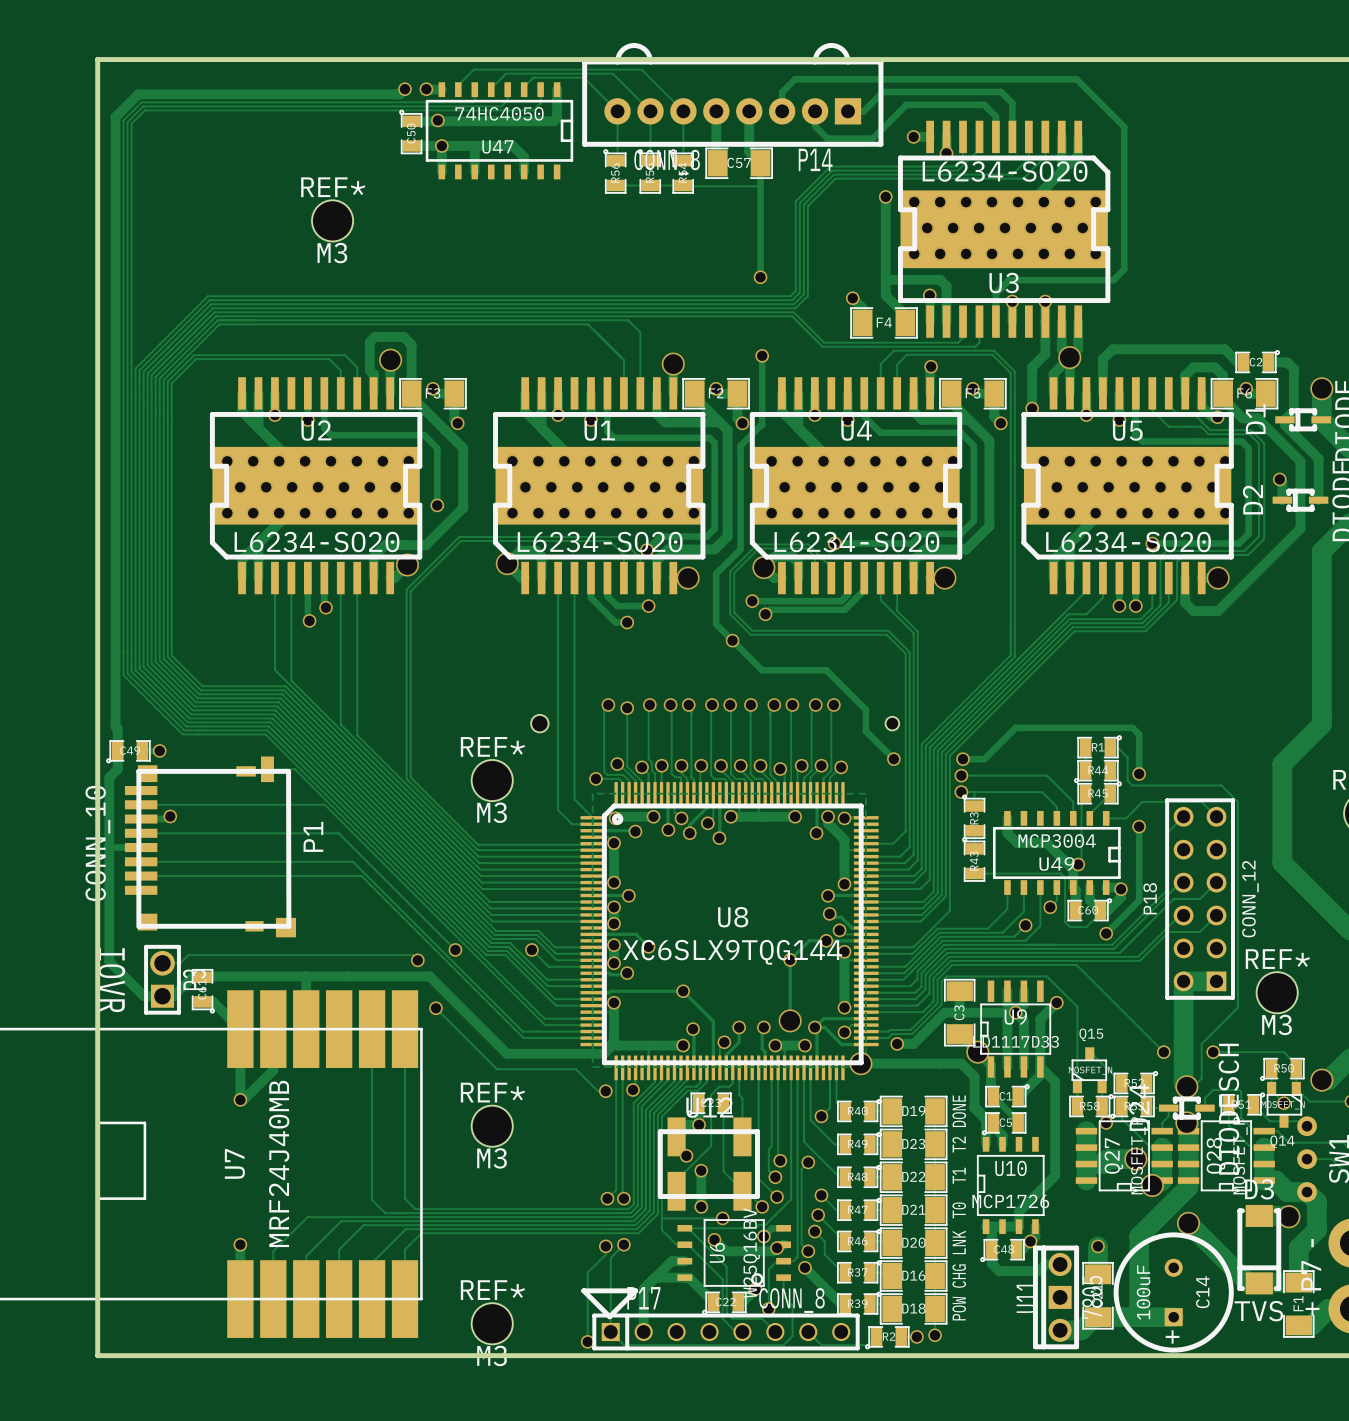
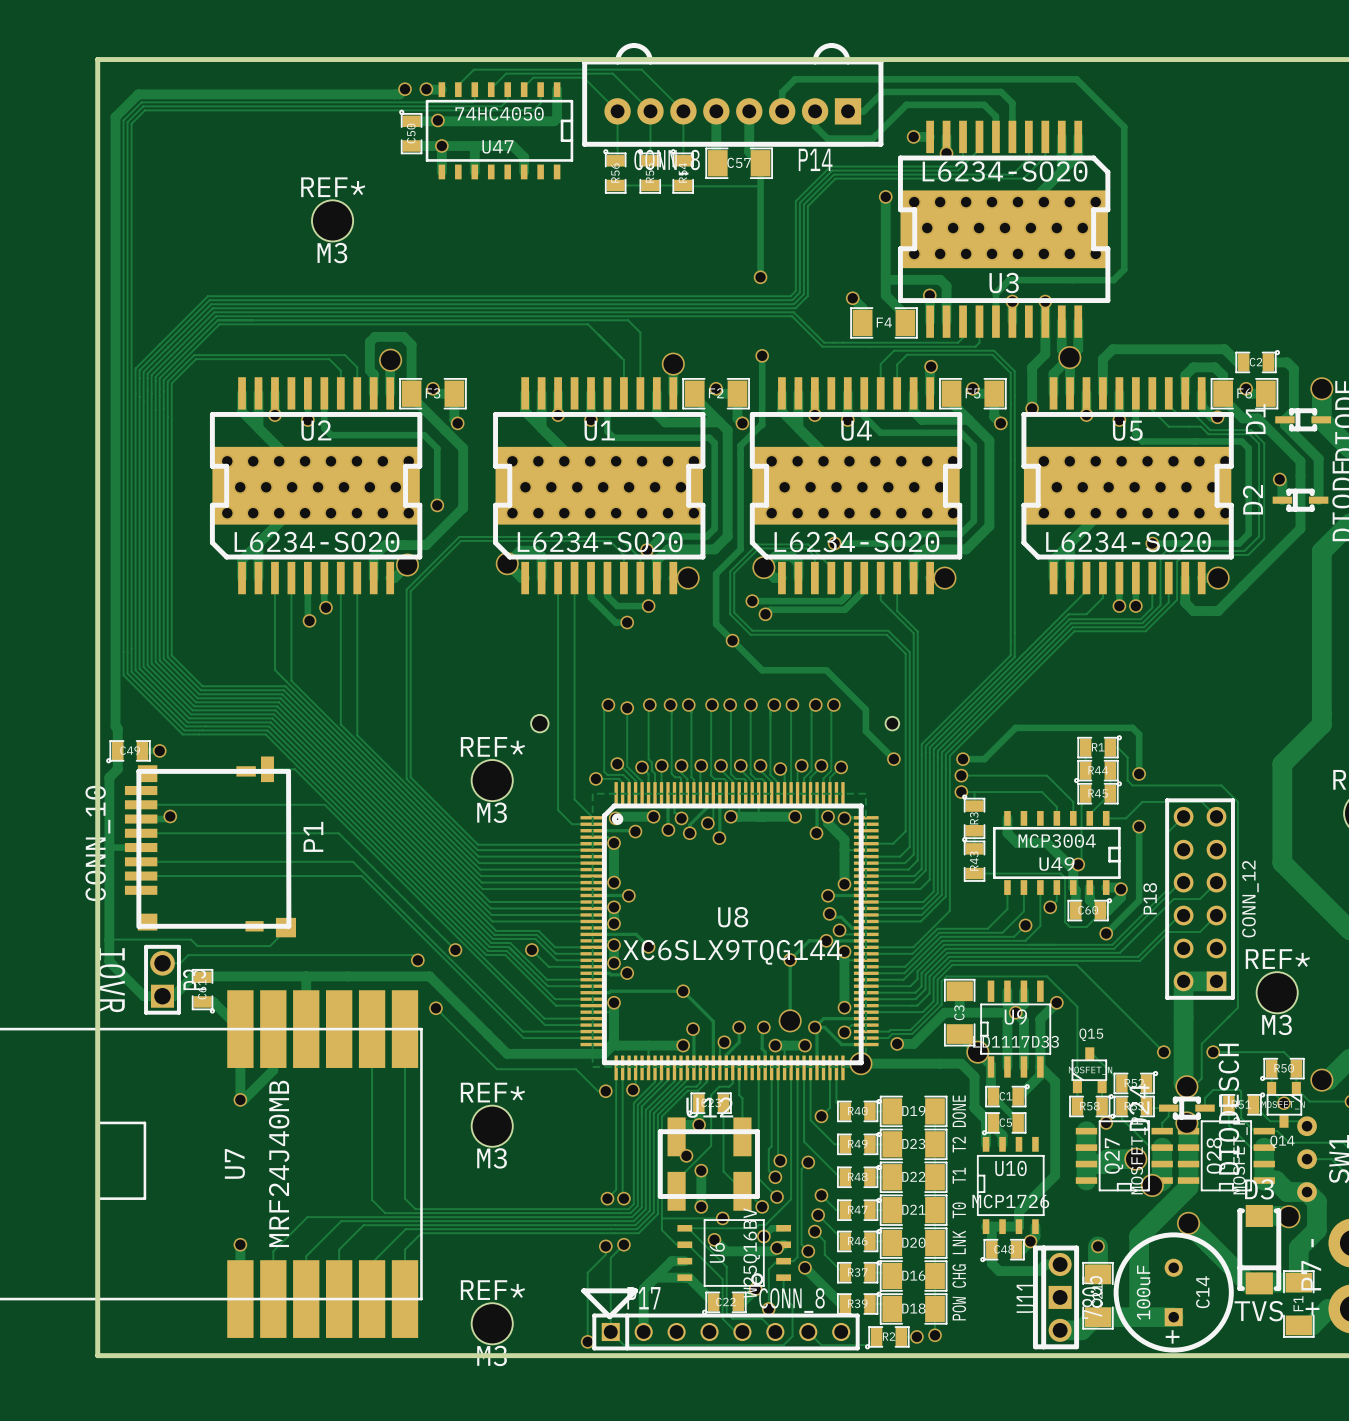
track: none -> (285, 927) (285, 930) (270, 946) (197, 946) (191, 939) (109, 939)

